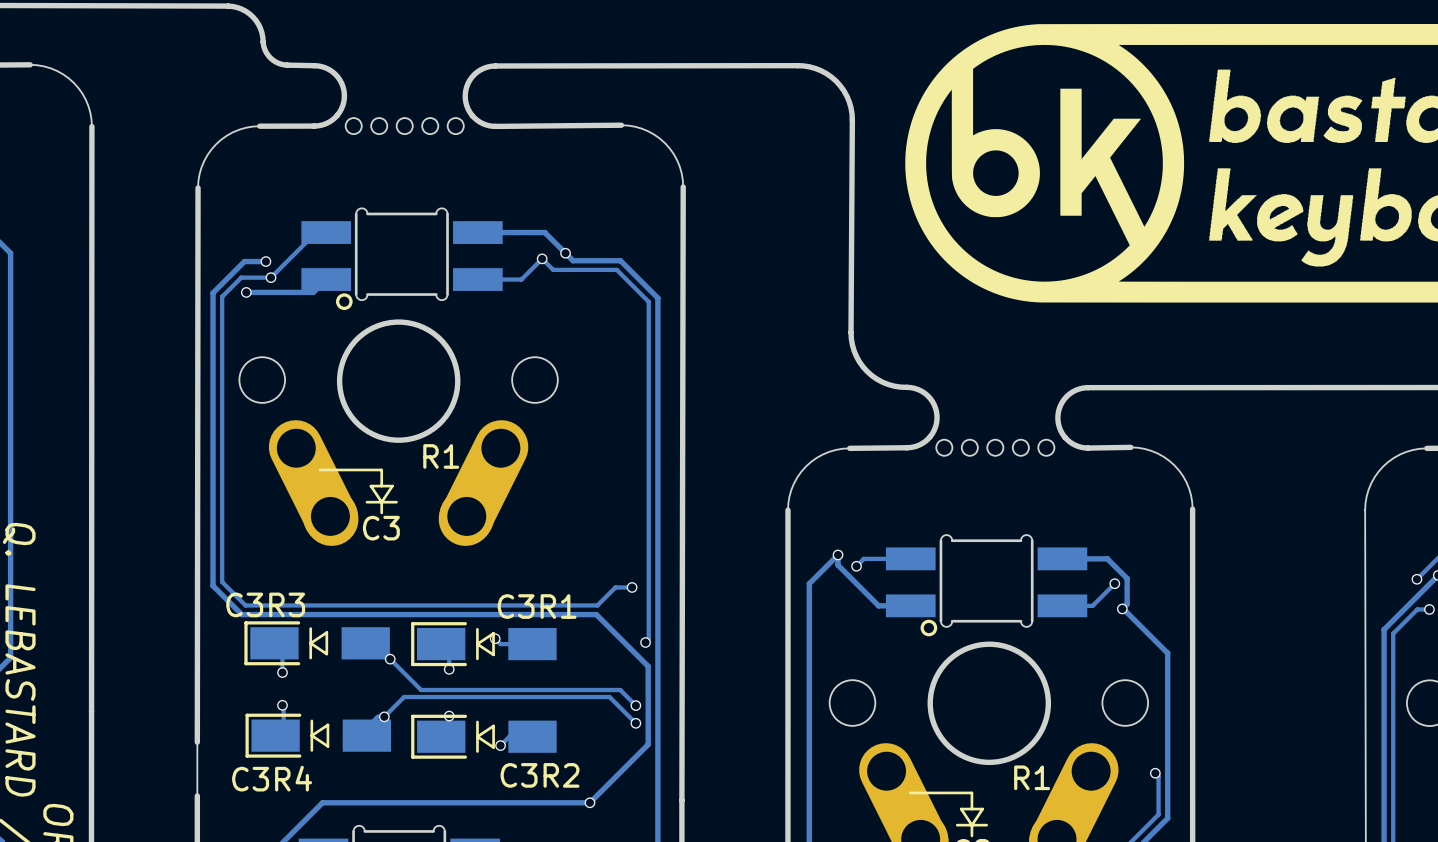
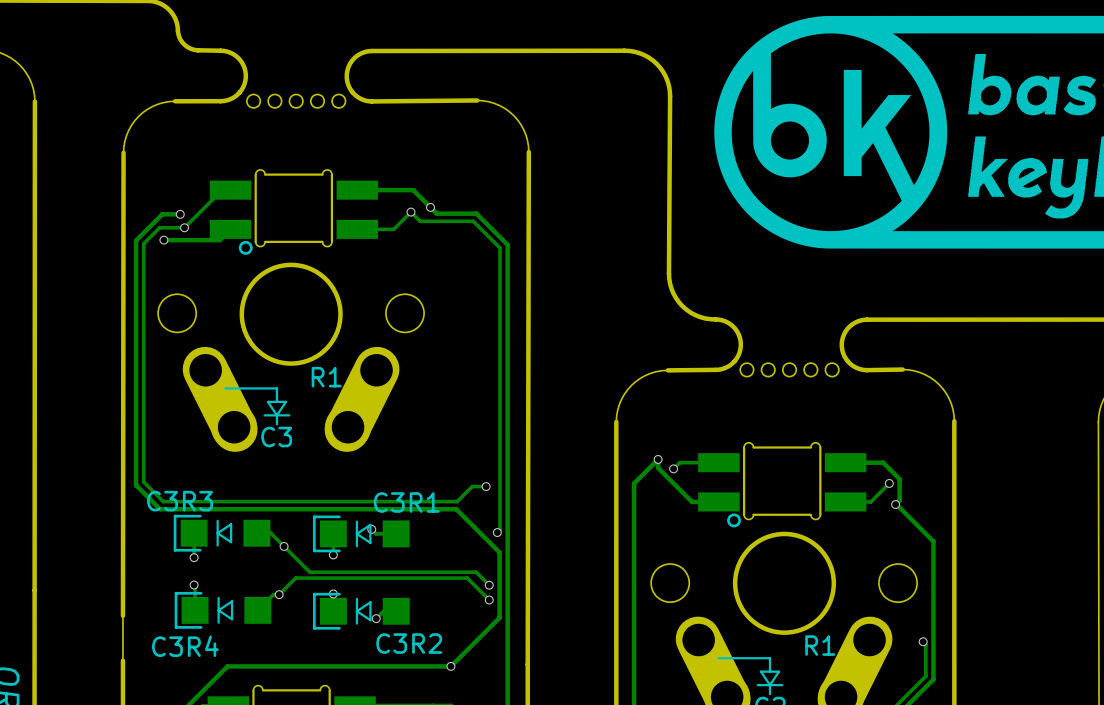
part footprint: [244, 621, 390, 666] -> [173, 514, 271, 552]
part footprint: [411, 622, 557, 667] -> [312, 515, 410, 553]
part footprint: [245, 713, 392, 758] -> [174, 591, 272, 629]
part footprint: [411, 714, 557, 759] -> [313, 592, 410, 630]

